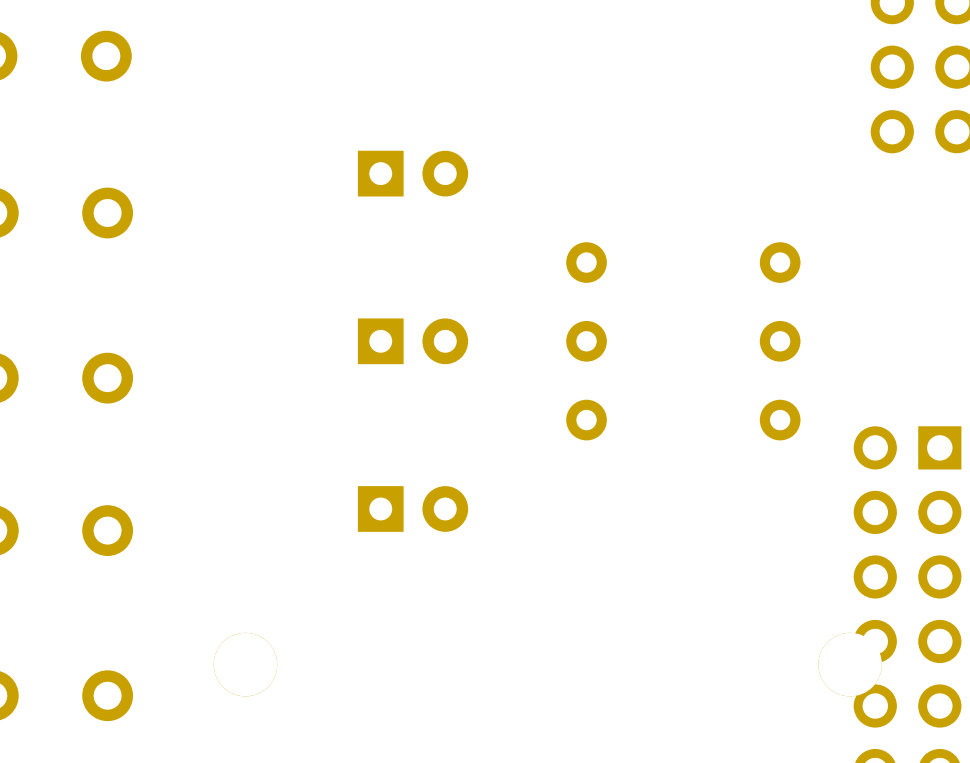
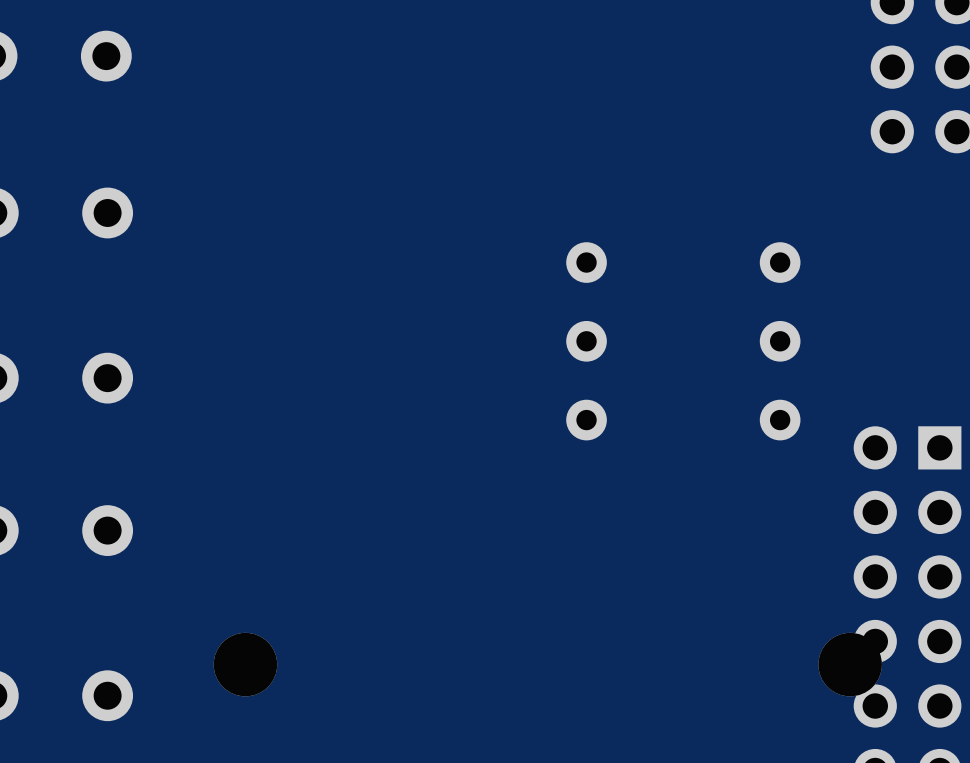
part: (413, 173) -> none
part: (413, 341) -> none
part: (413, 508) -> none

